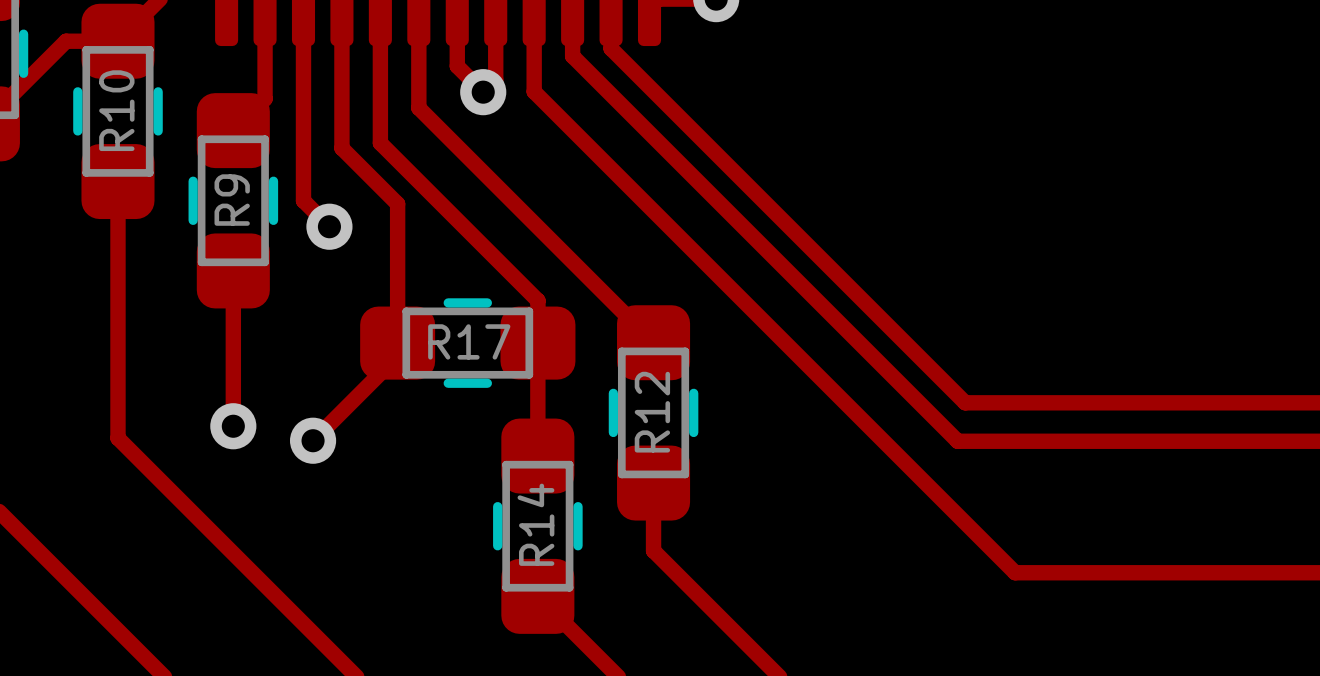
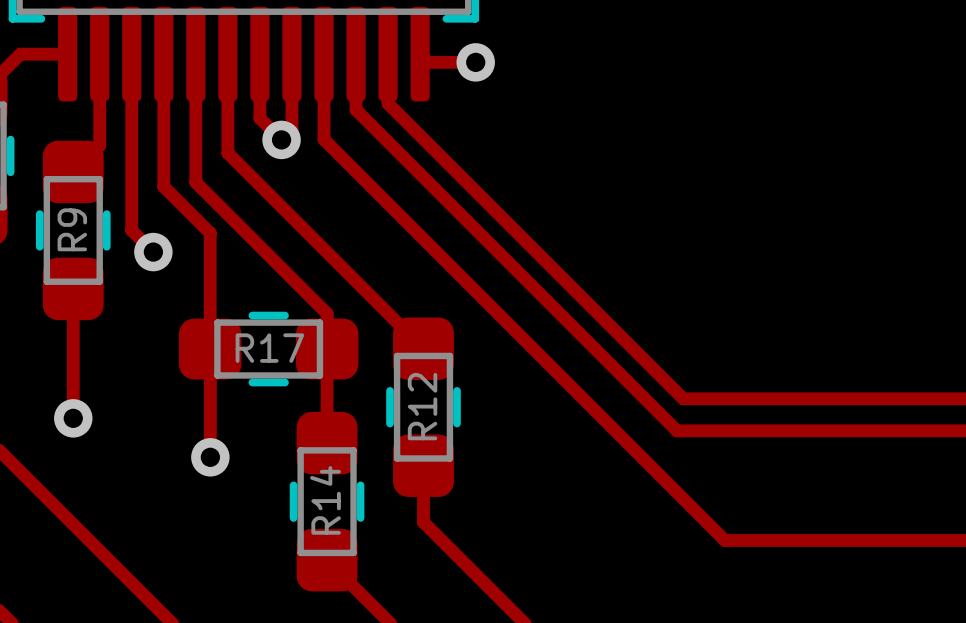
track: (397, 355) (313, 440) -> (210, 359) (210, 457)
via position: (313, 440) -> (210, 457)

